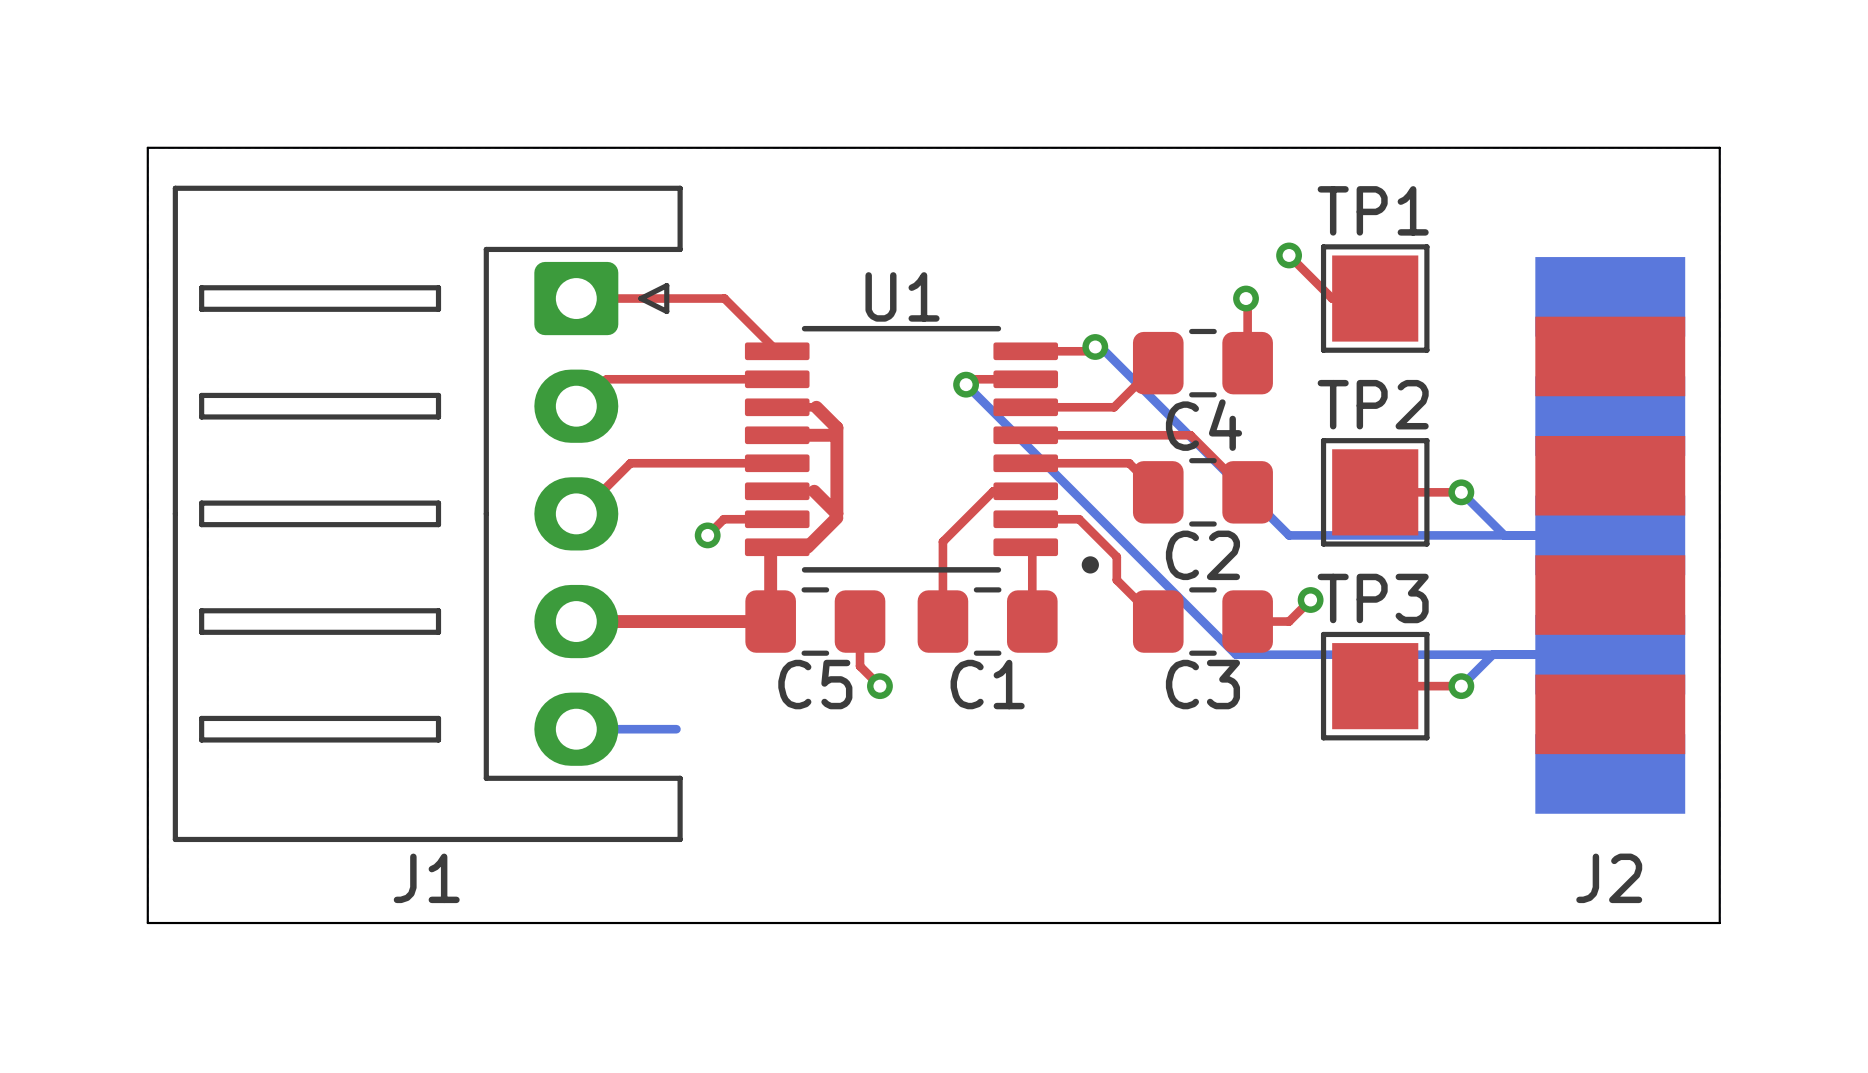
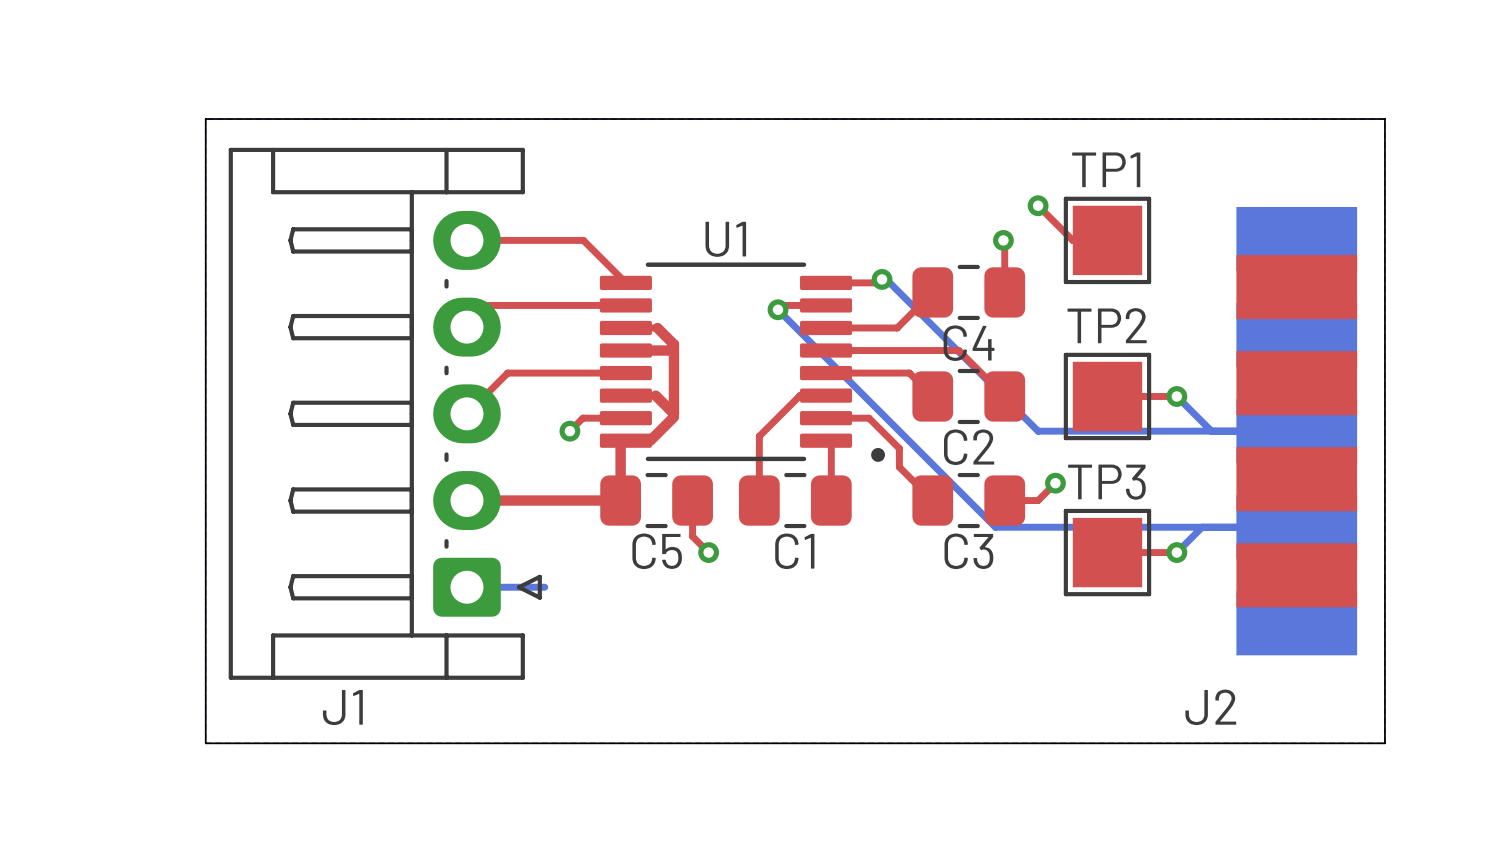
board edge: (255, 147) (147, 147) (147, 923) (255, 923) -> (205, 119) (205, 743)
J1 footprint: [172, 185, 683, 843] -> [228, 147, 542, 680]
J2 name position: J2 (1609, 878) -> J2 (1210, 707)

